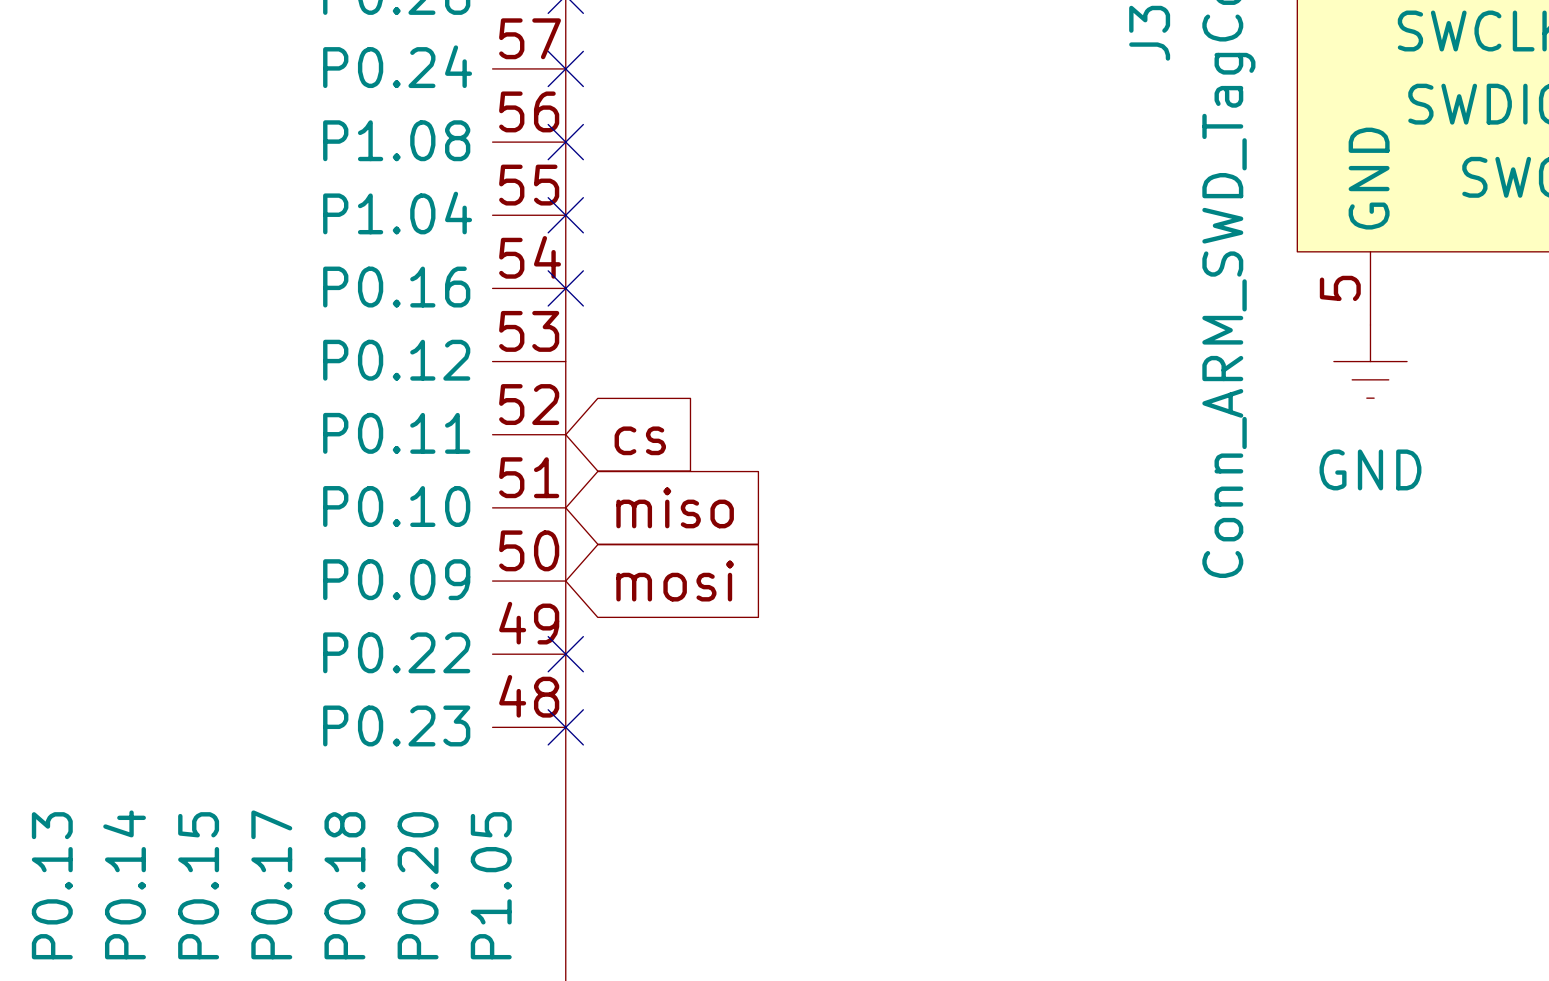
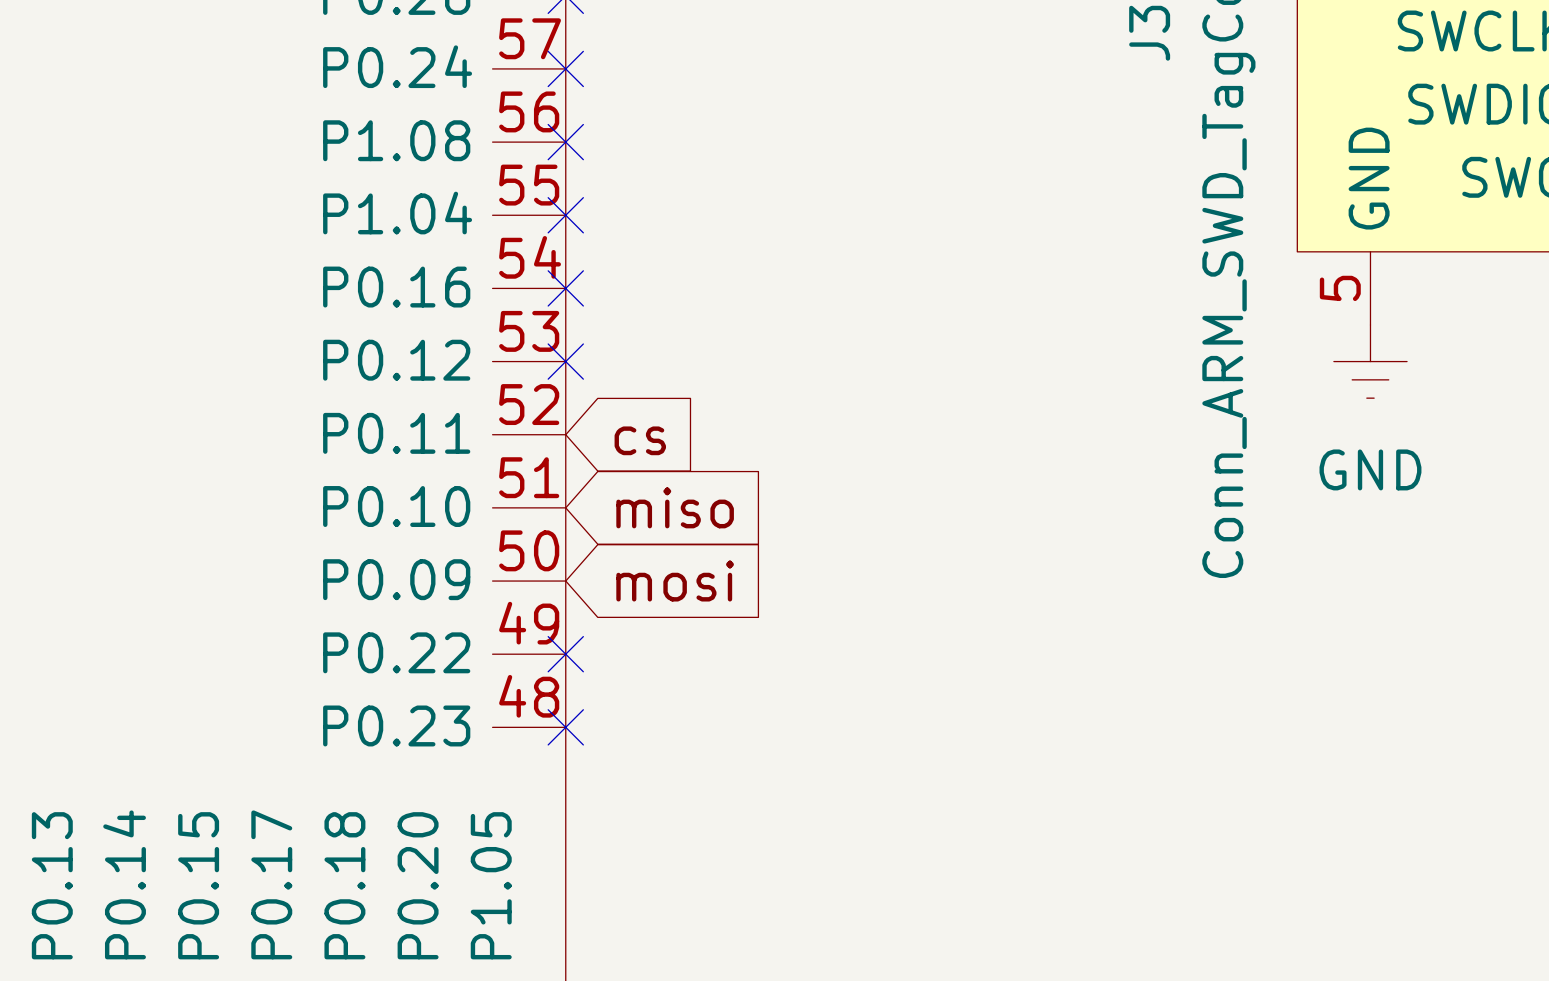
no-connect mark: none -> (565, 361)

